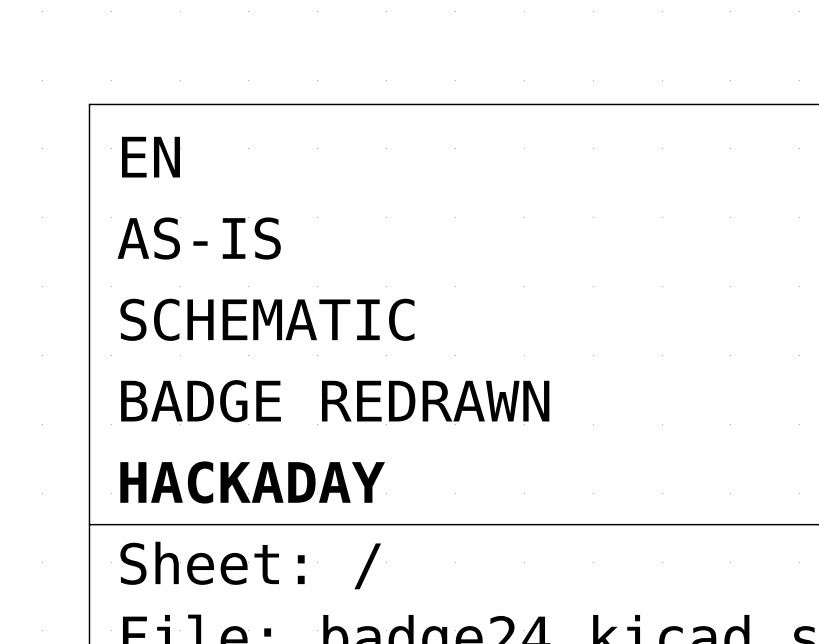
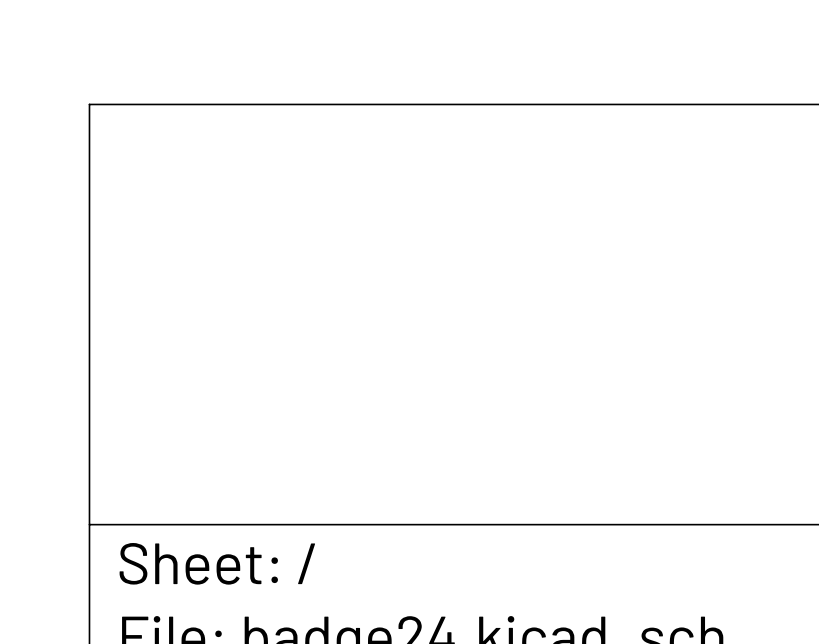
title block: EN (150, 157) -> none
title block: AS-IS (199, 238) -> none
title block: SCHEMATIC (267, 319) -> none
title block: BADGE REDRAWN (335, 401) -> none
title block: HACKADAY (252, 482) -> none

